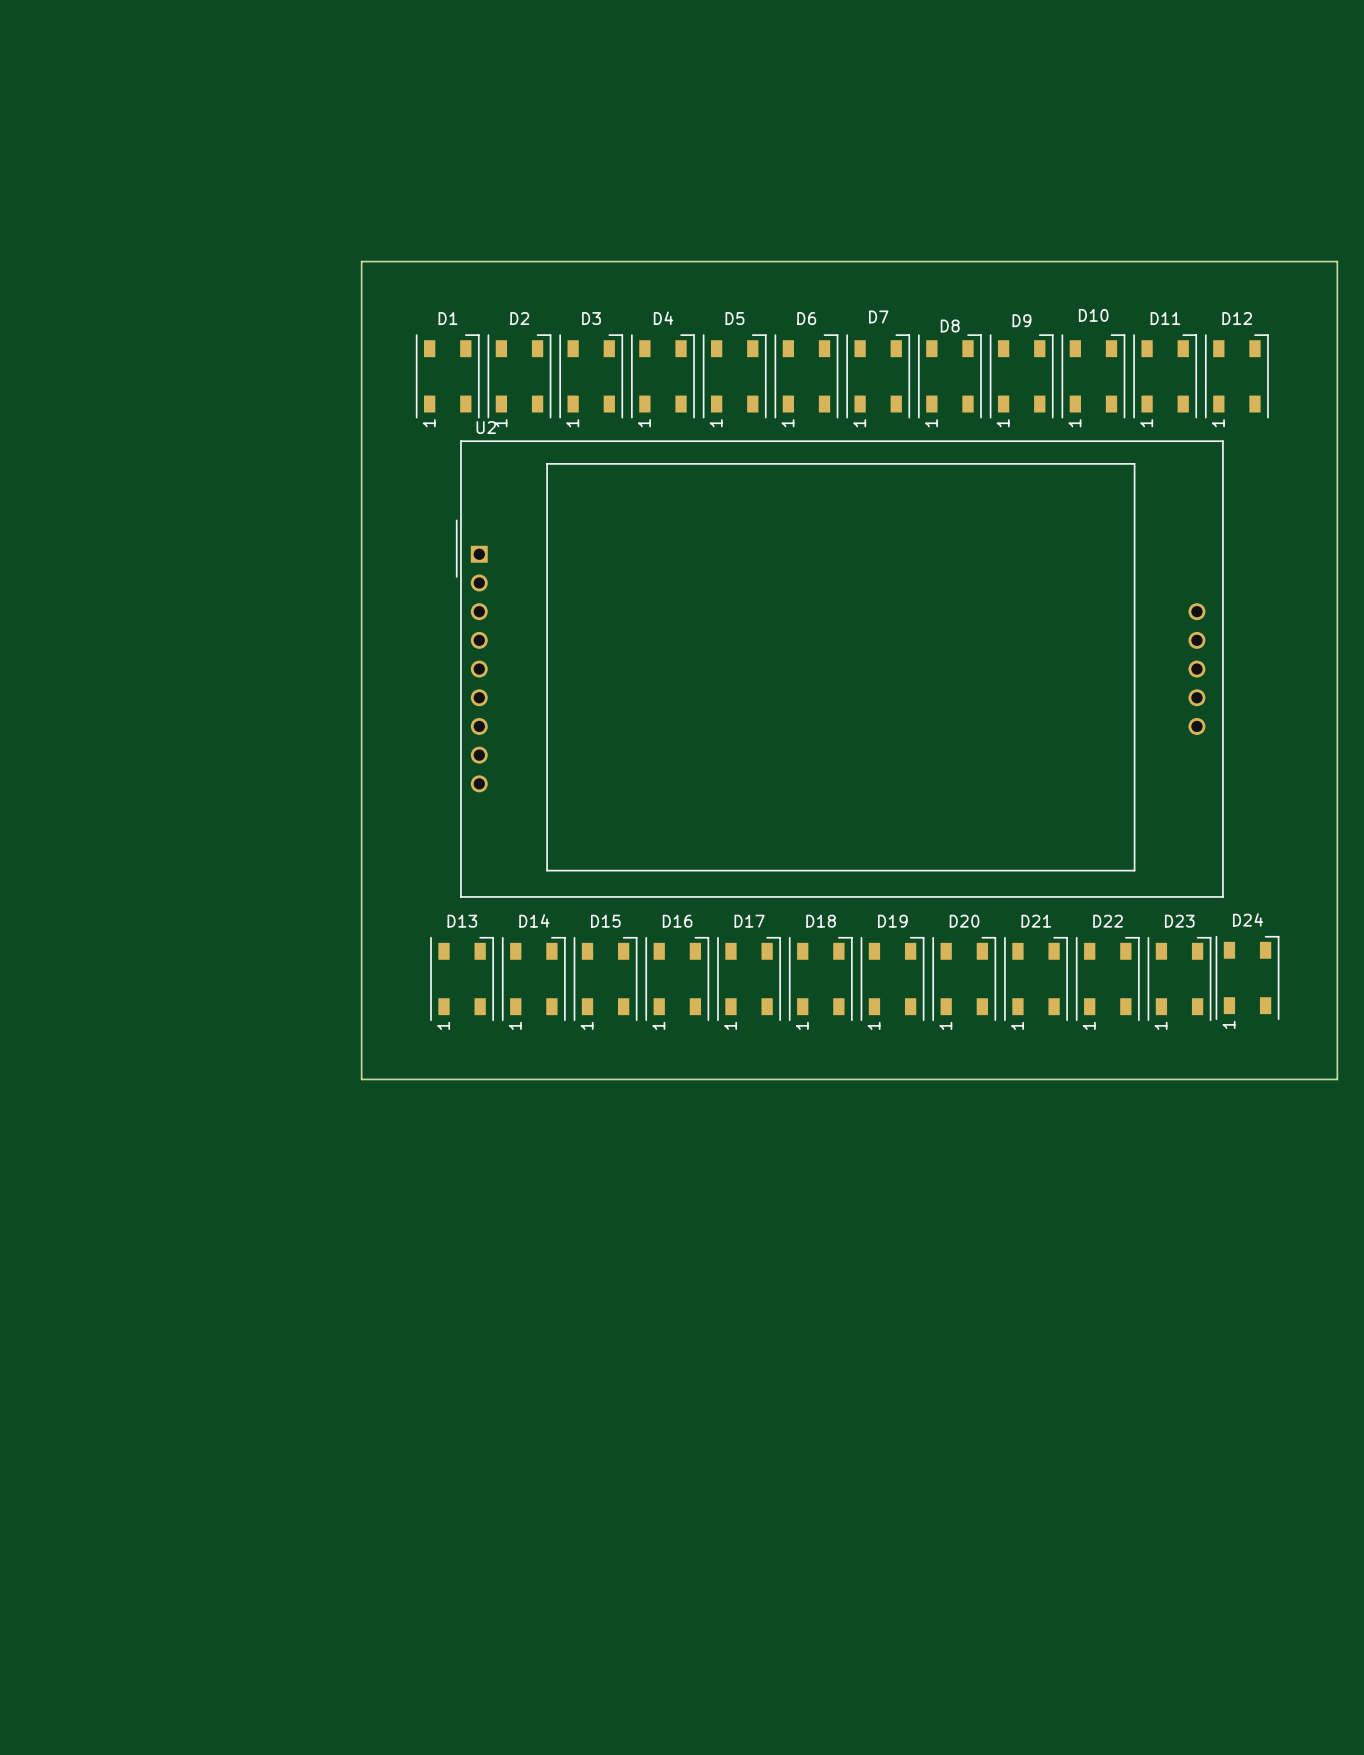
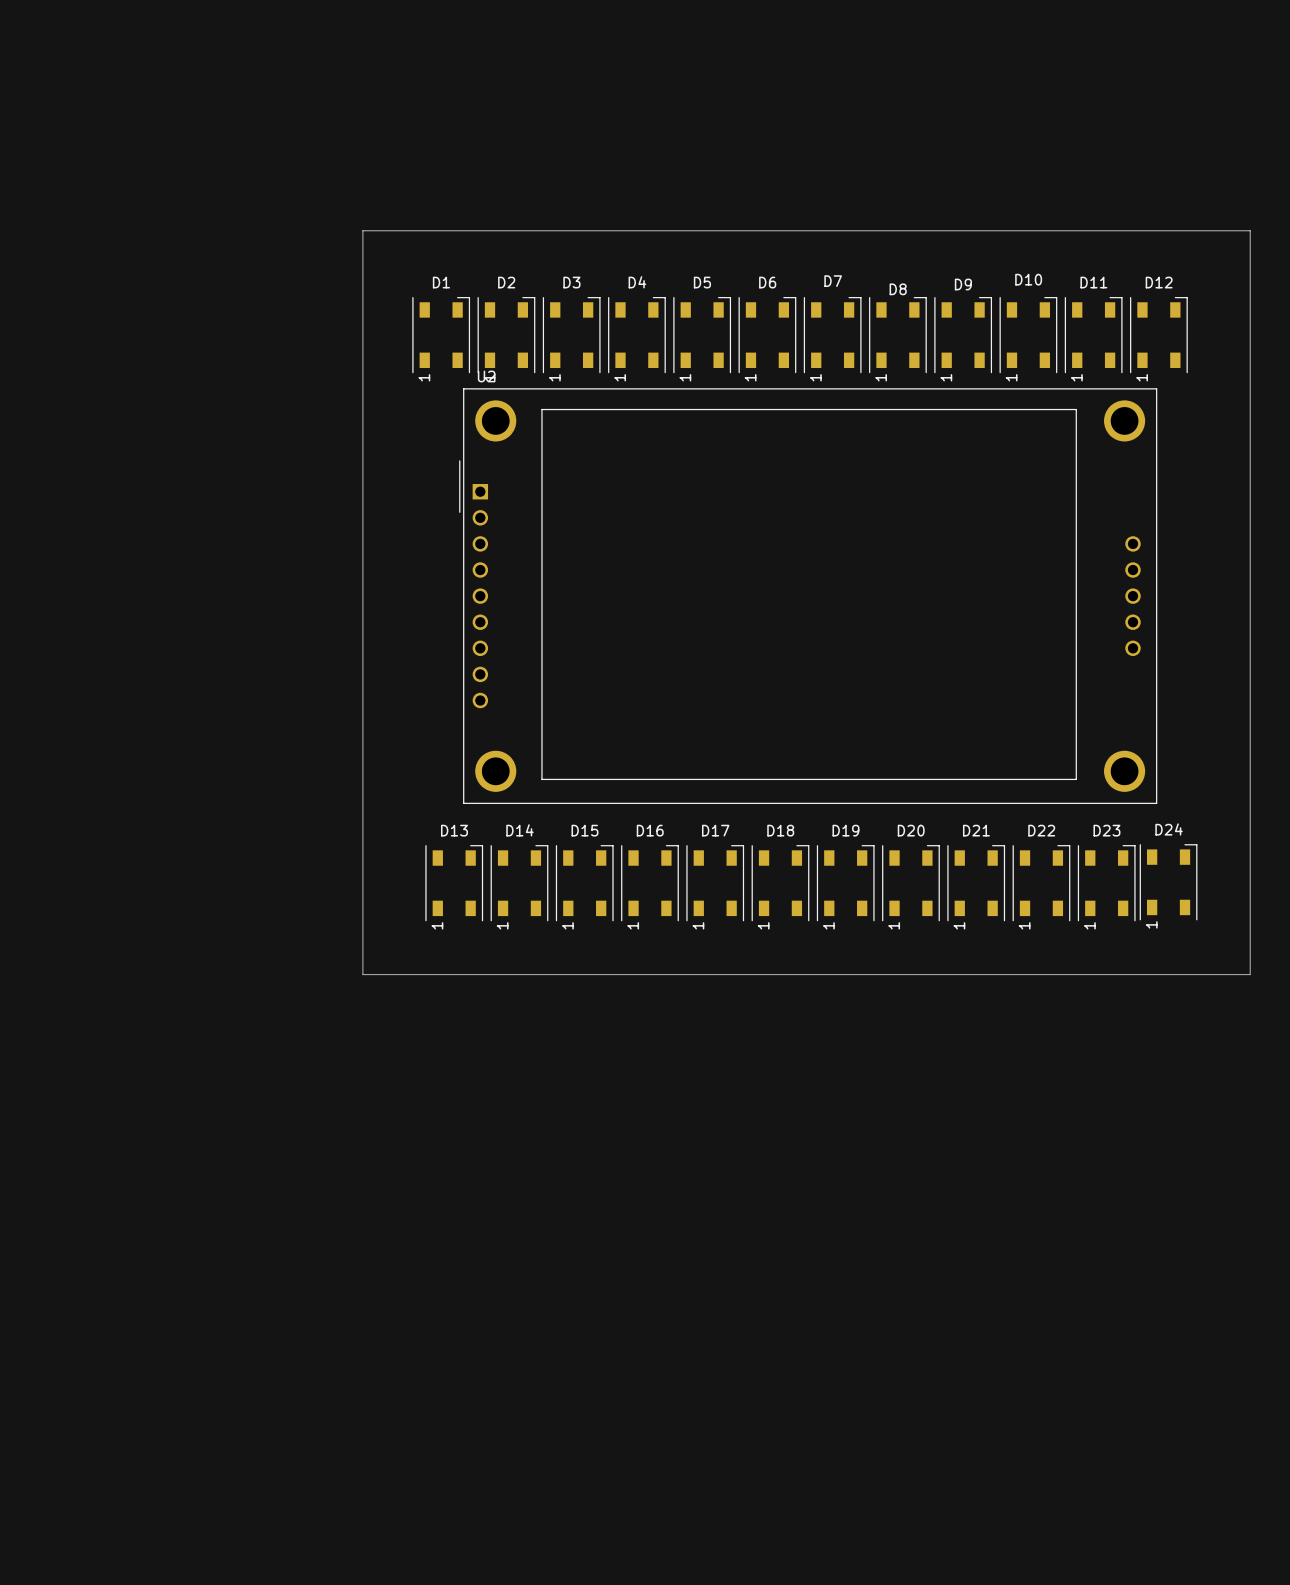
U2 footprint: [456, 440, 1224, 898] -> [459, 388, 1158, 804]

